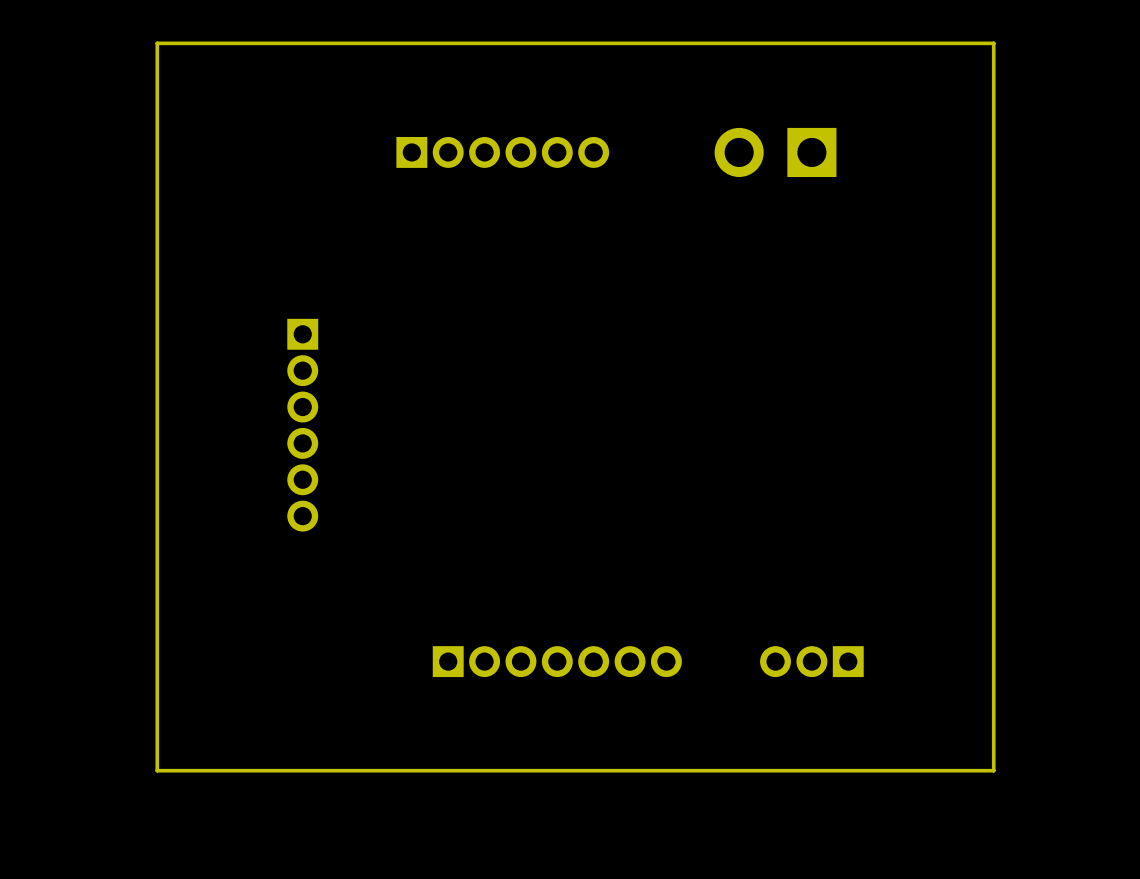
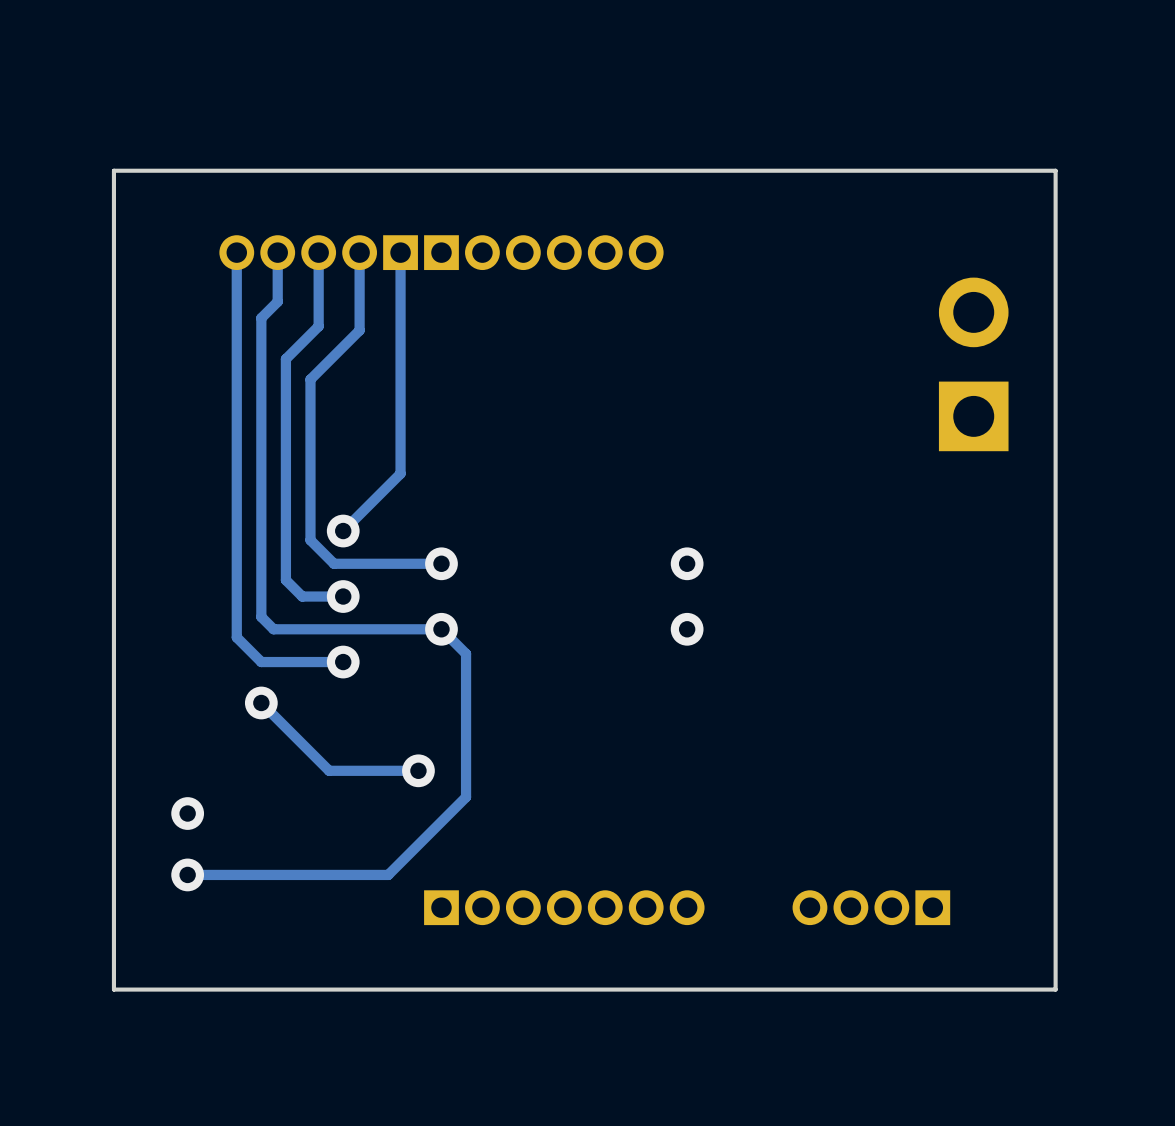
track: none -> (236, 252) (236, 637) (261, 662) (343, 662)
track: none -> (277, 252) (277, 301) (261, 318) (261, 617) (273, 629) (441, 629) (466, 653) (466, 797) (388, 874) (187, 874)
track: none -> (318, 252) (318, 326) (285, 359) (285, 580) (302, 596) (343, 596)
part: none -> (318, 252)
track: none -> (359, 252) (359, 330) (310, 379) (310, 540) (334, 563) (441, 563)
track: none -> (400, 252) (400, 473) (343, 531)
part position: (502, 152) -> (543, 252)
part: (775, 152) -> none
part: none -> (973, 364)
via: none -> (343, 531)
via: none -> (441, 563)
via: none -> (687, 563)
via: none -> (343, 596)
part: (302, 425) -> none
via: none -> (441, 629)
via: none -> (687, 629)
via: none -> (343, 662)
track: none -> (261, 702) (329, 770) (418, 770)
via: none -> (261, 702)
via: none -> (418, 770)
via: none -> (187, 813)
part position: (557, 661) -> (564, 907)
part: (811, 661) -> none
via: none -> (187, 874)
part: none -> (871, 907)

